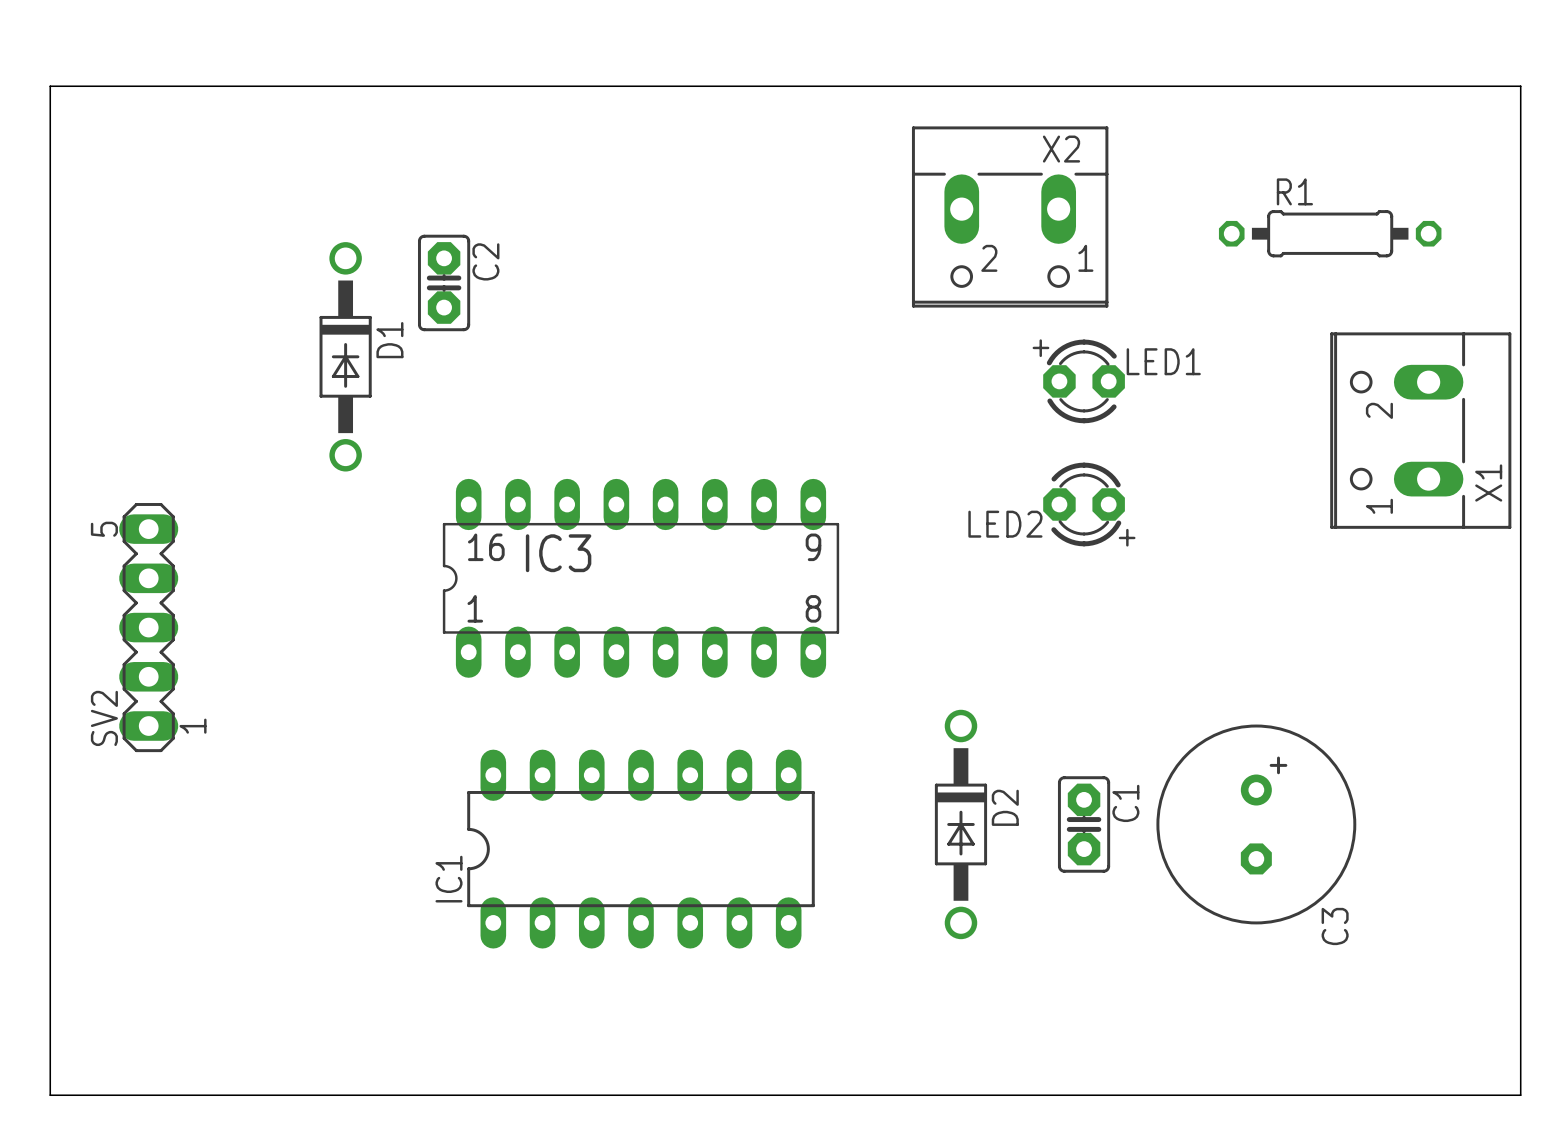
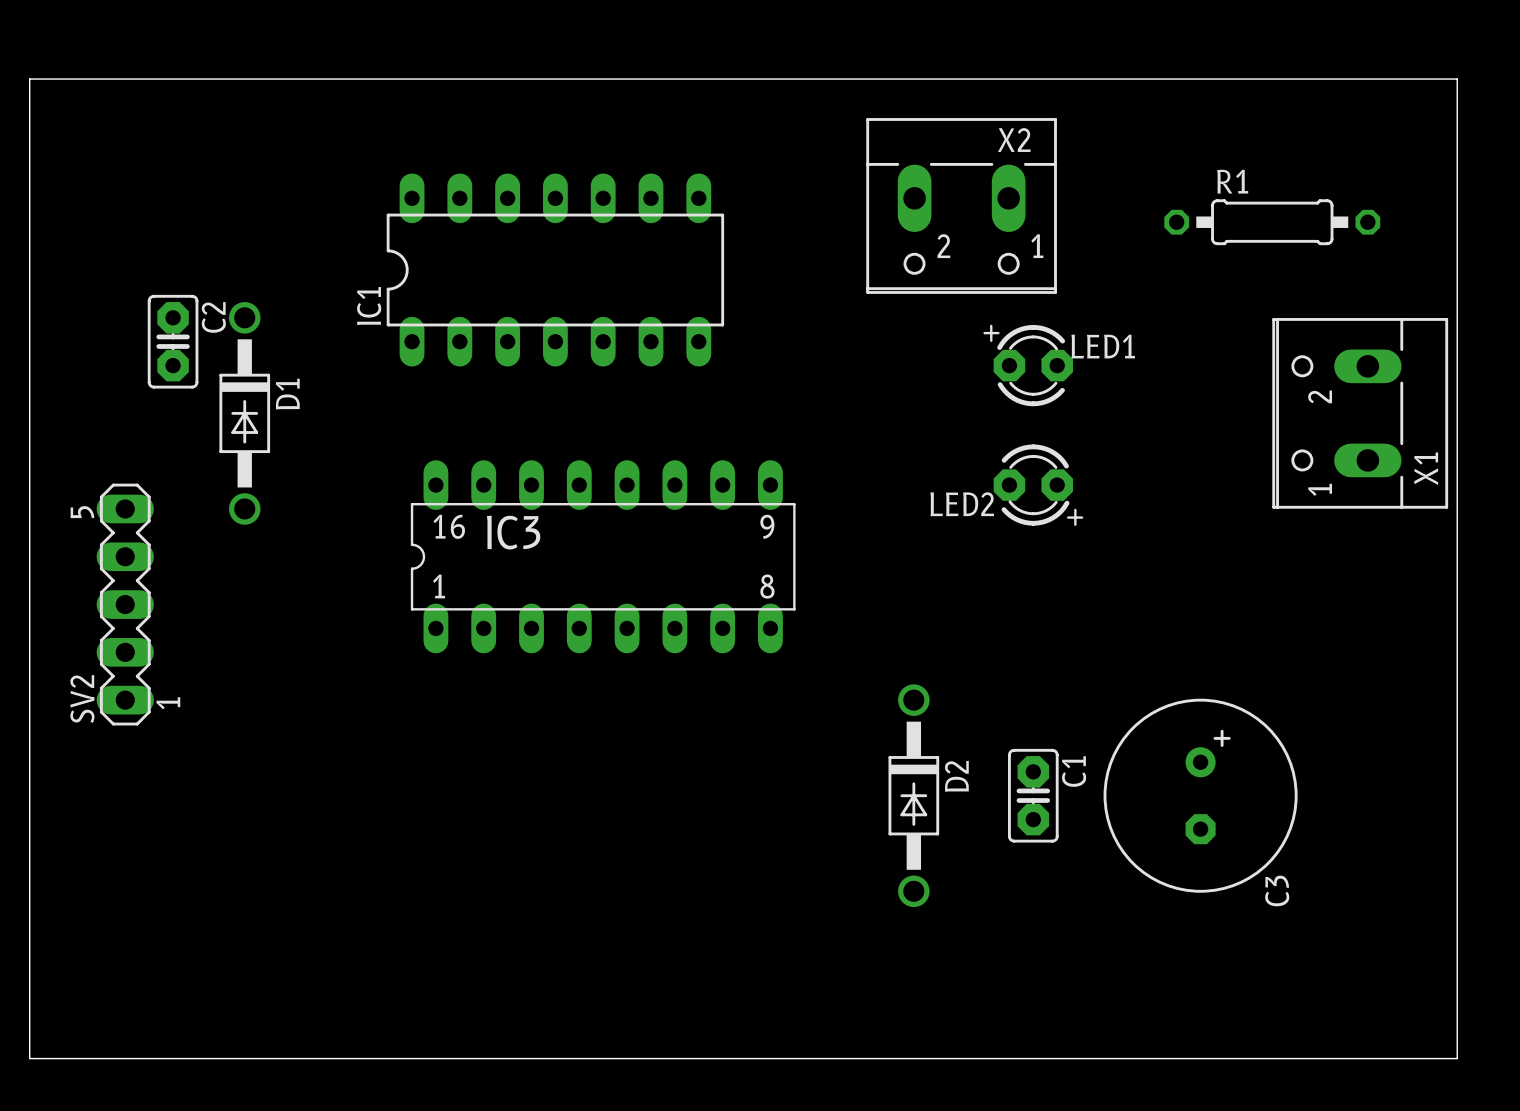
C2 position: (444, 282) -> (173, 341)
D1 position: (345, 356) -> (244, 413)
IC1 position: (640, 849) -> (555, 270)

